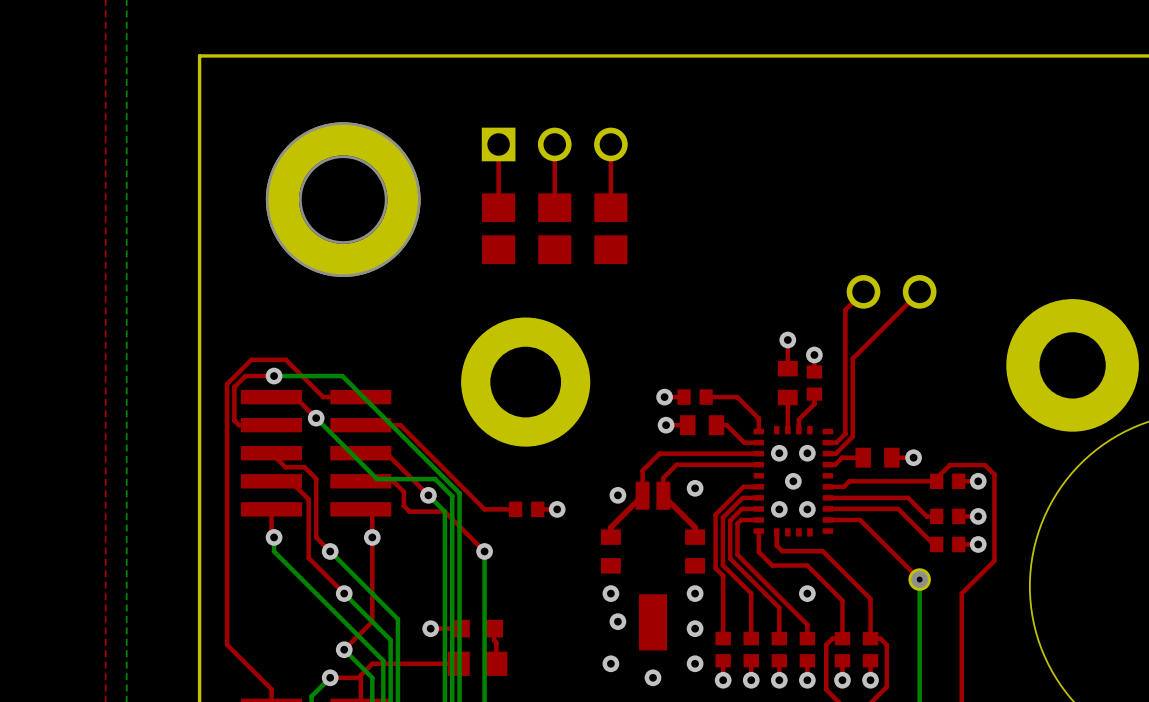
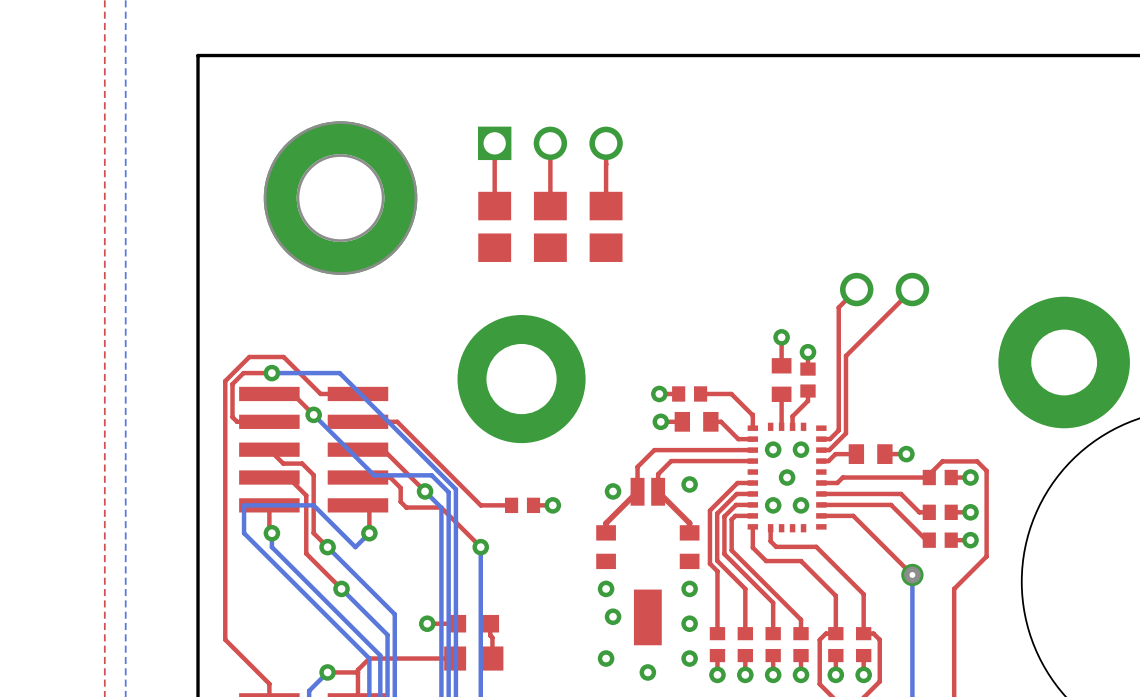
top track: (372, 537) (372, 621) (344, 649) -> none
via: (807, 593) -> none
bottom track: (344, 649) (372, 677) -> (369, 533) (355, 547) (313, 505) (244, 505) (244, 533) (369, 658) (369, 672)
via: (344, 649) -> none

